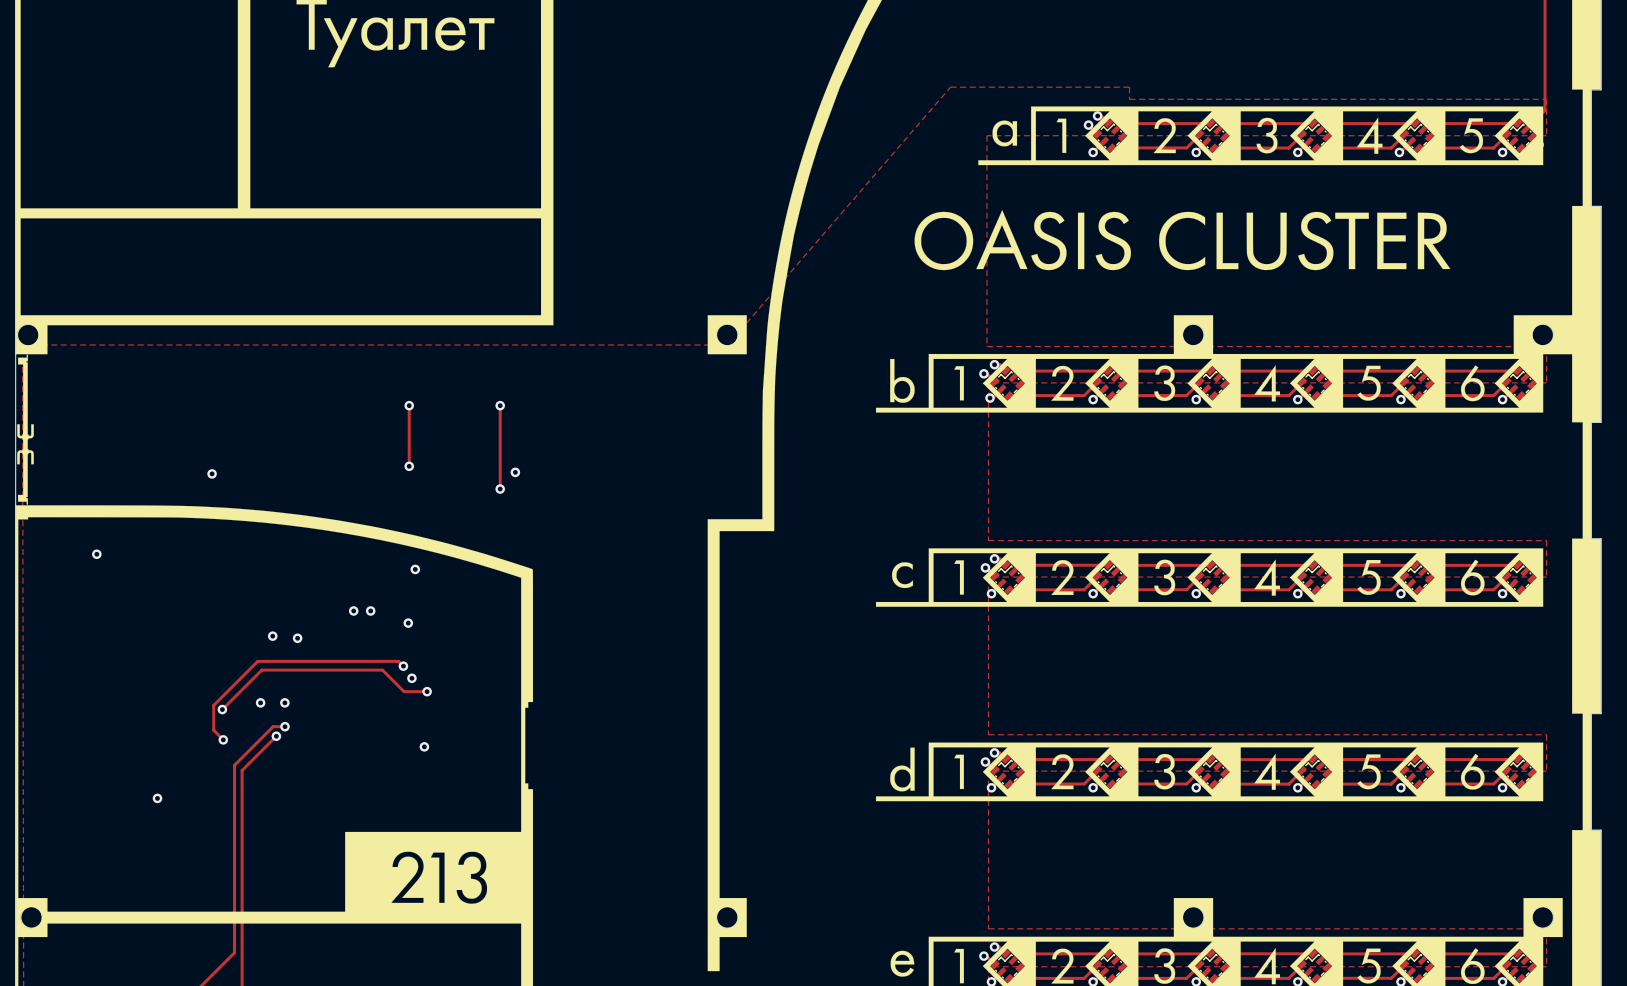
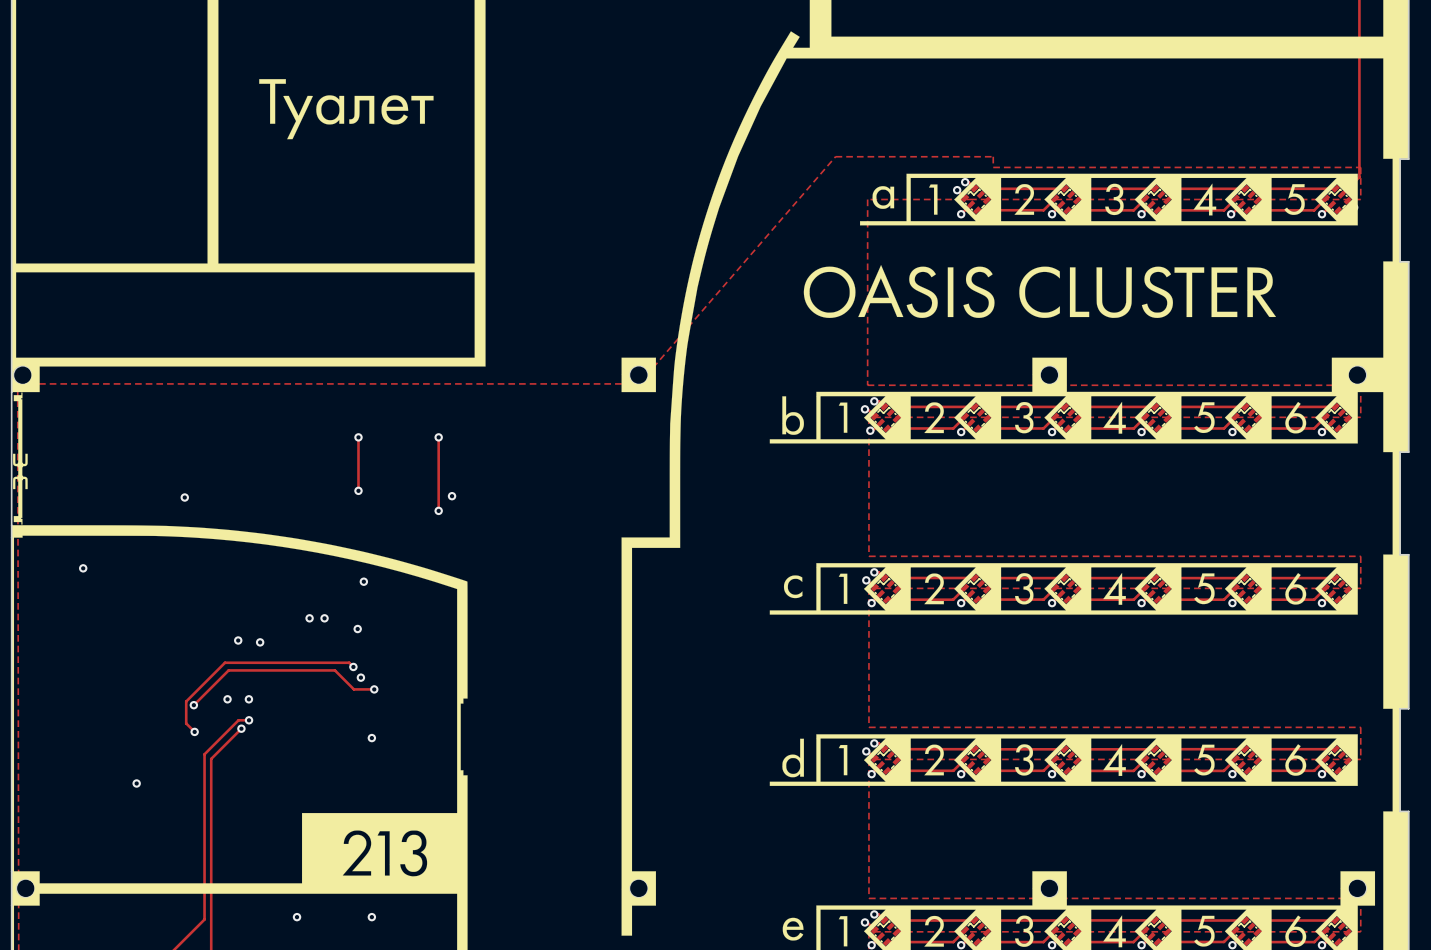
via: none -> (297, 917)
via: none -> (371, 917)

